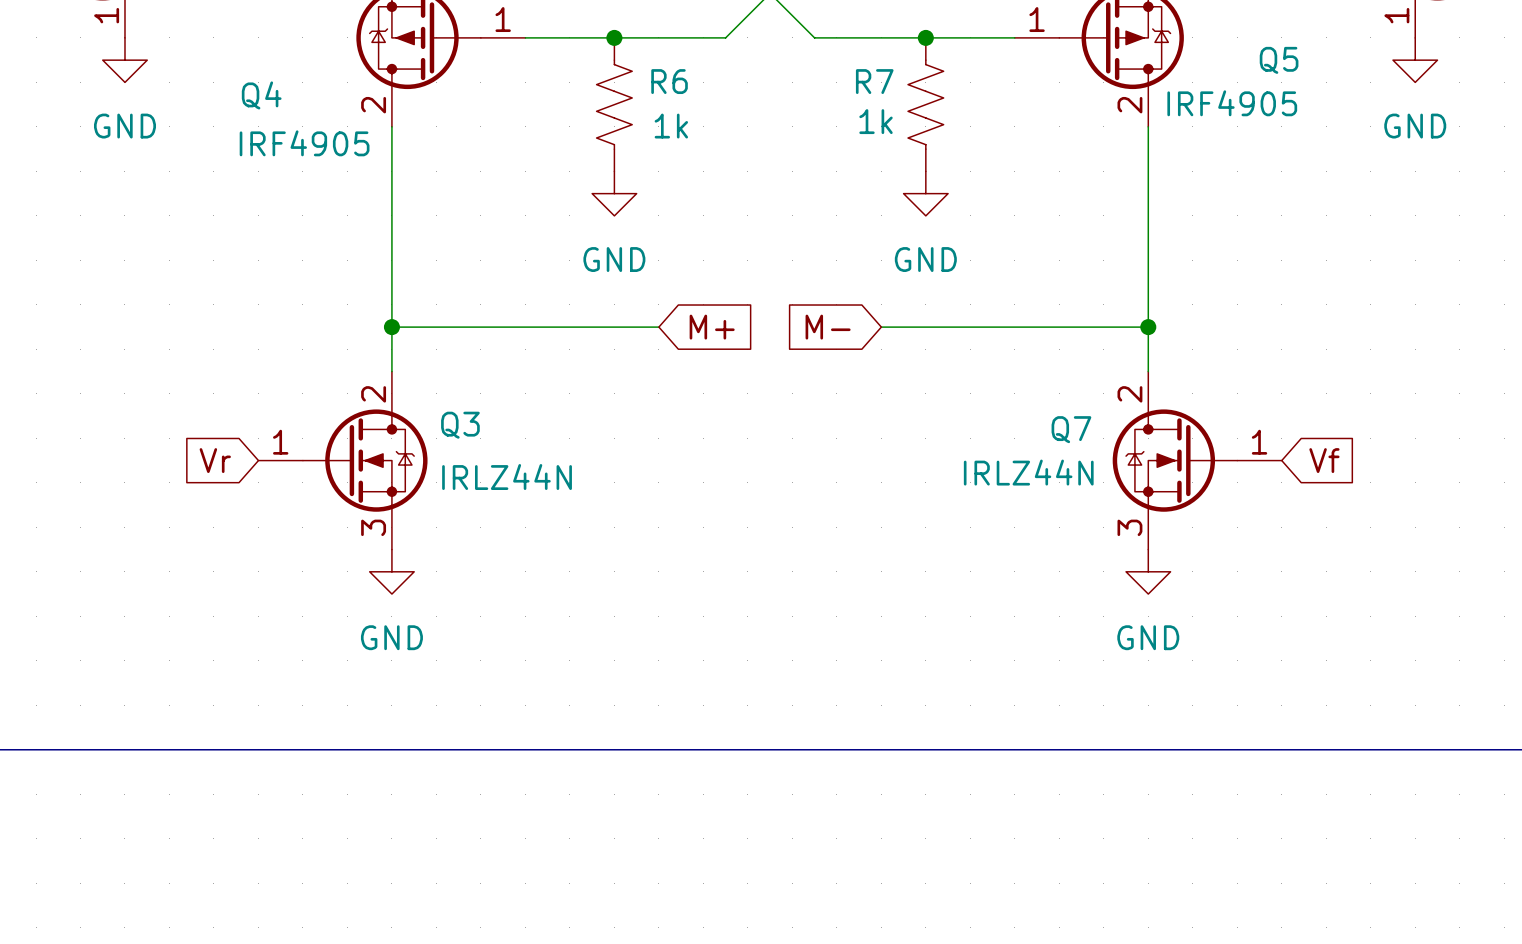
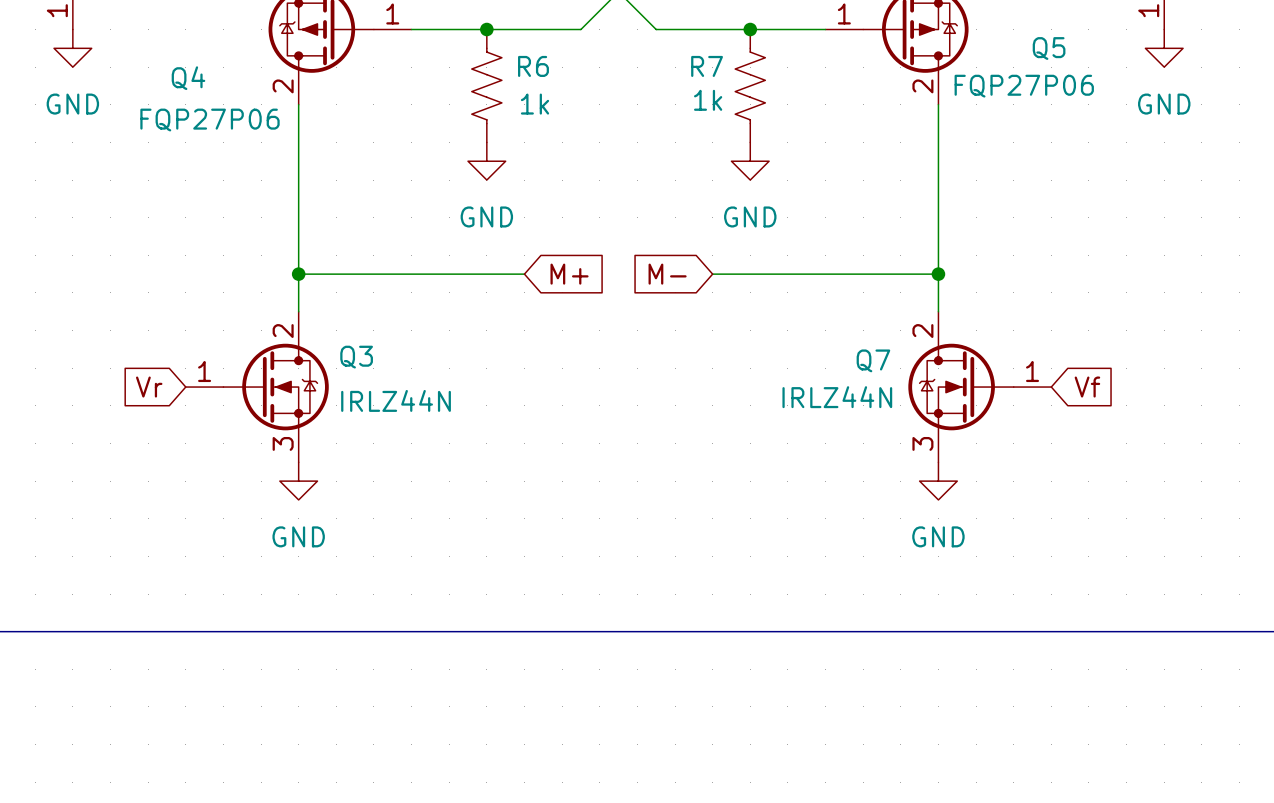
Q5 value: IRF4905 (1232, 103) -> FQP27P06 (1024, 86)
Q4 value: IRF4905 (304, 143) -> FQP27P06 (209, 120)

